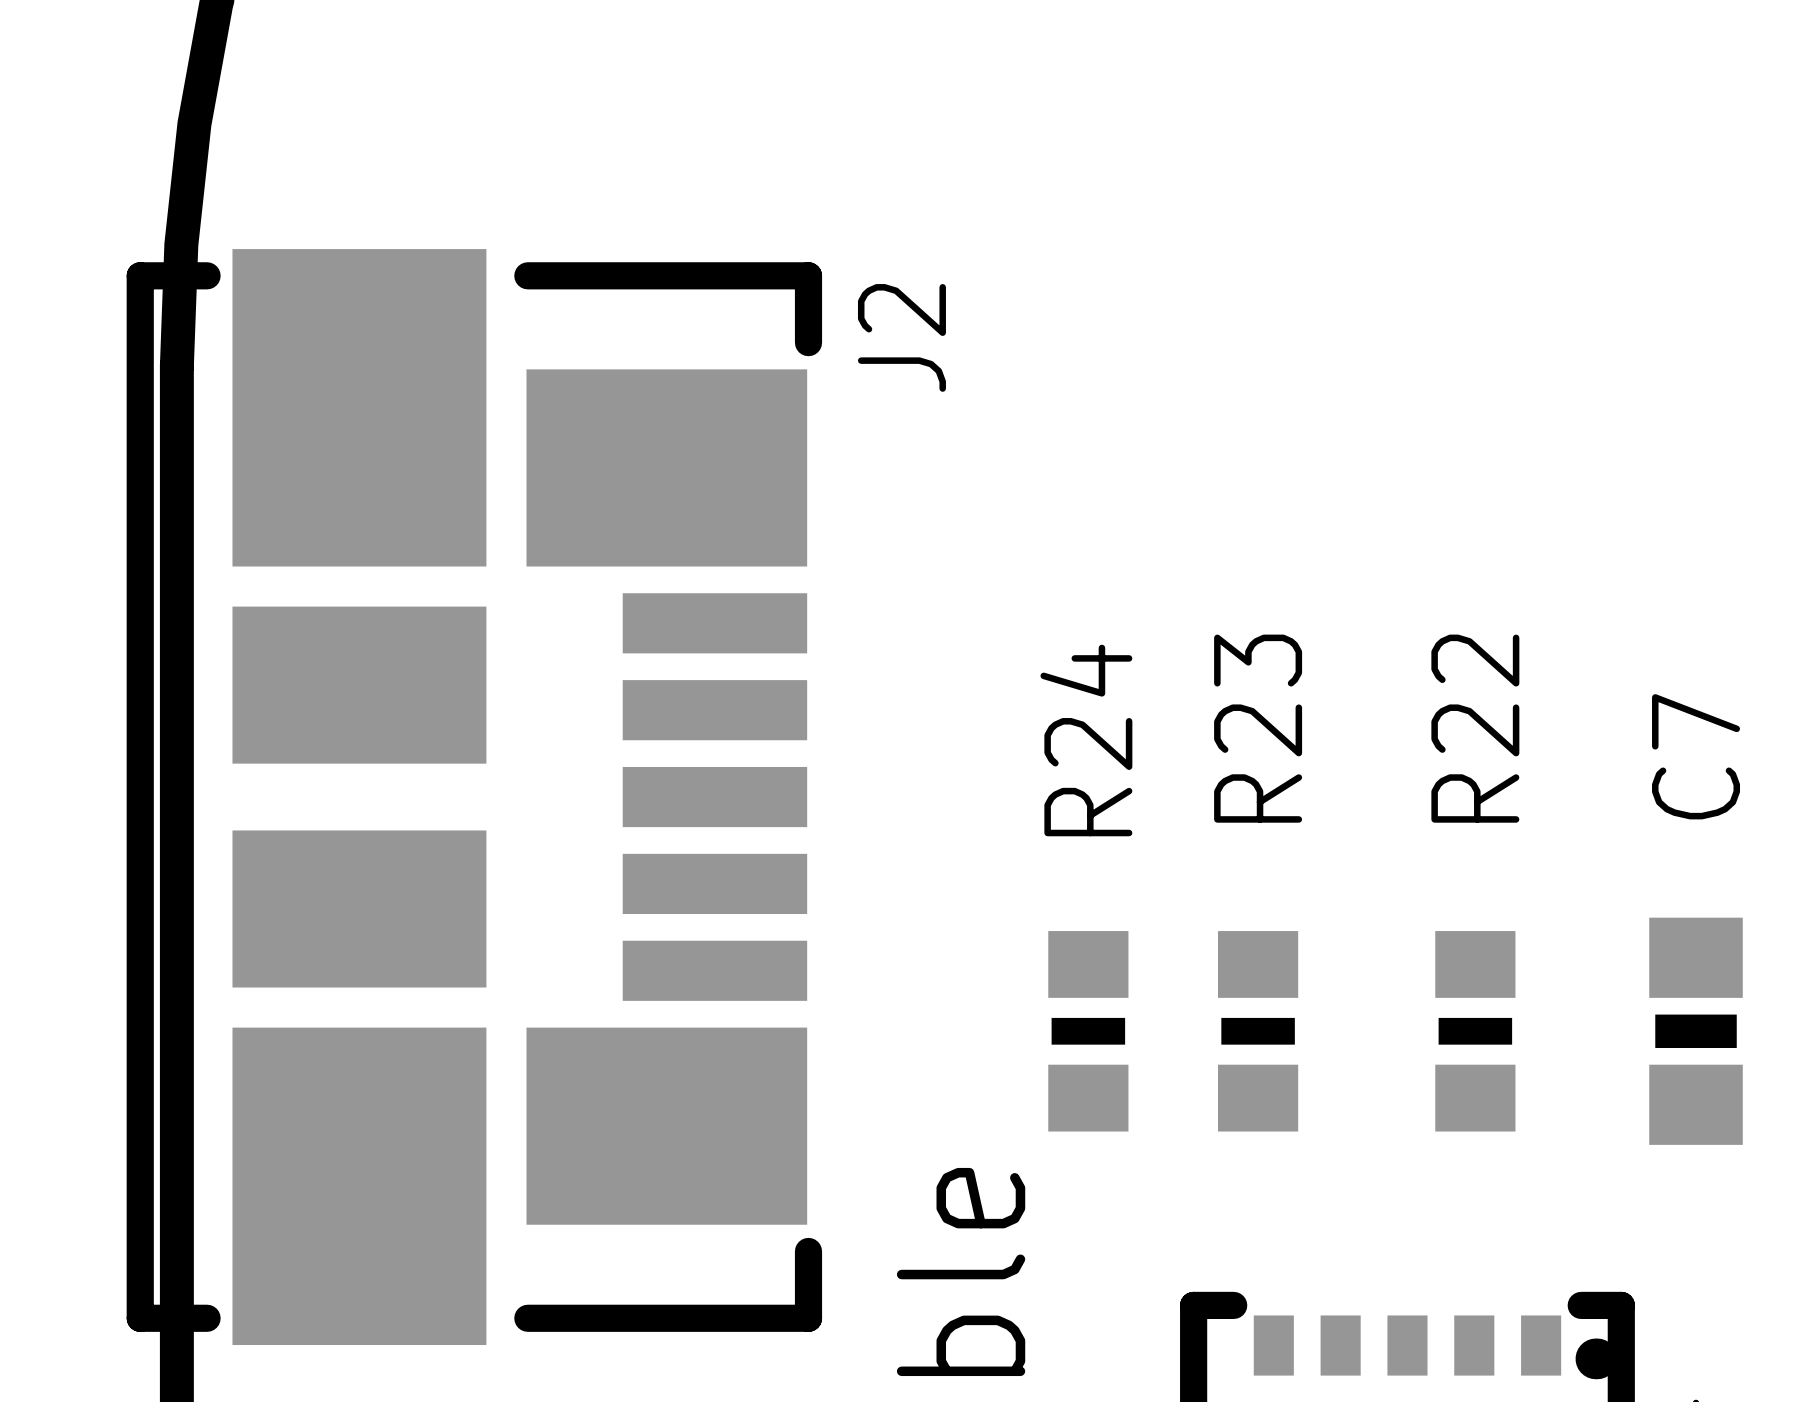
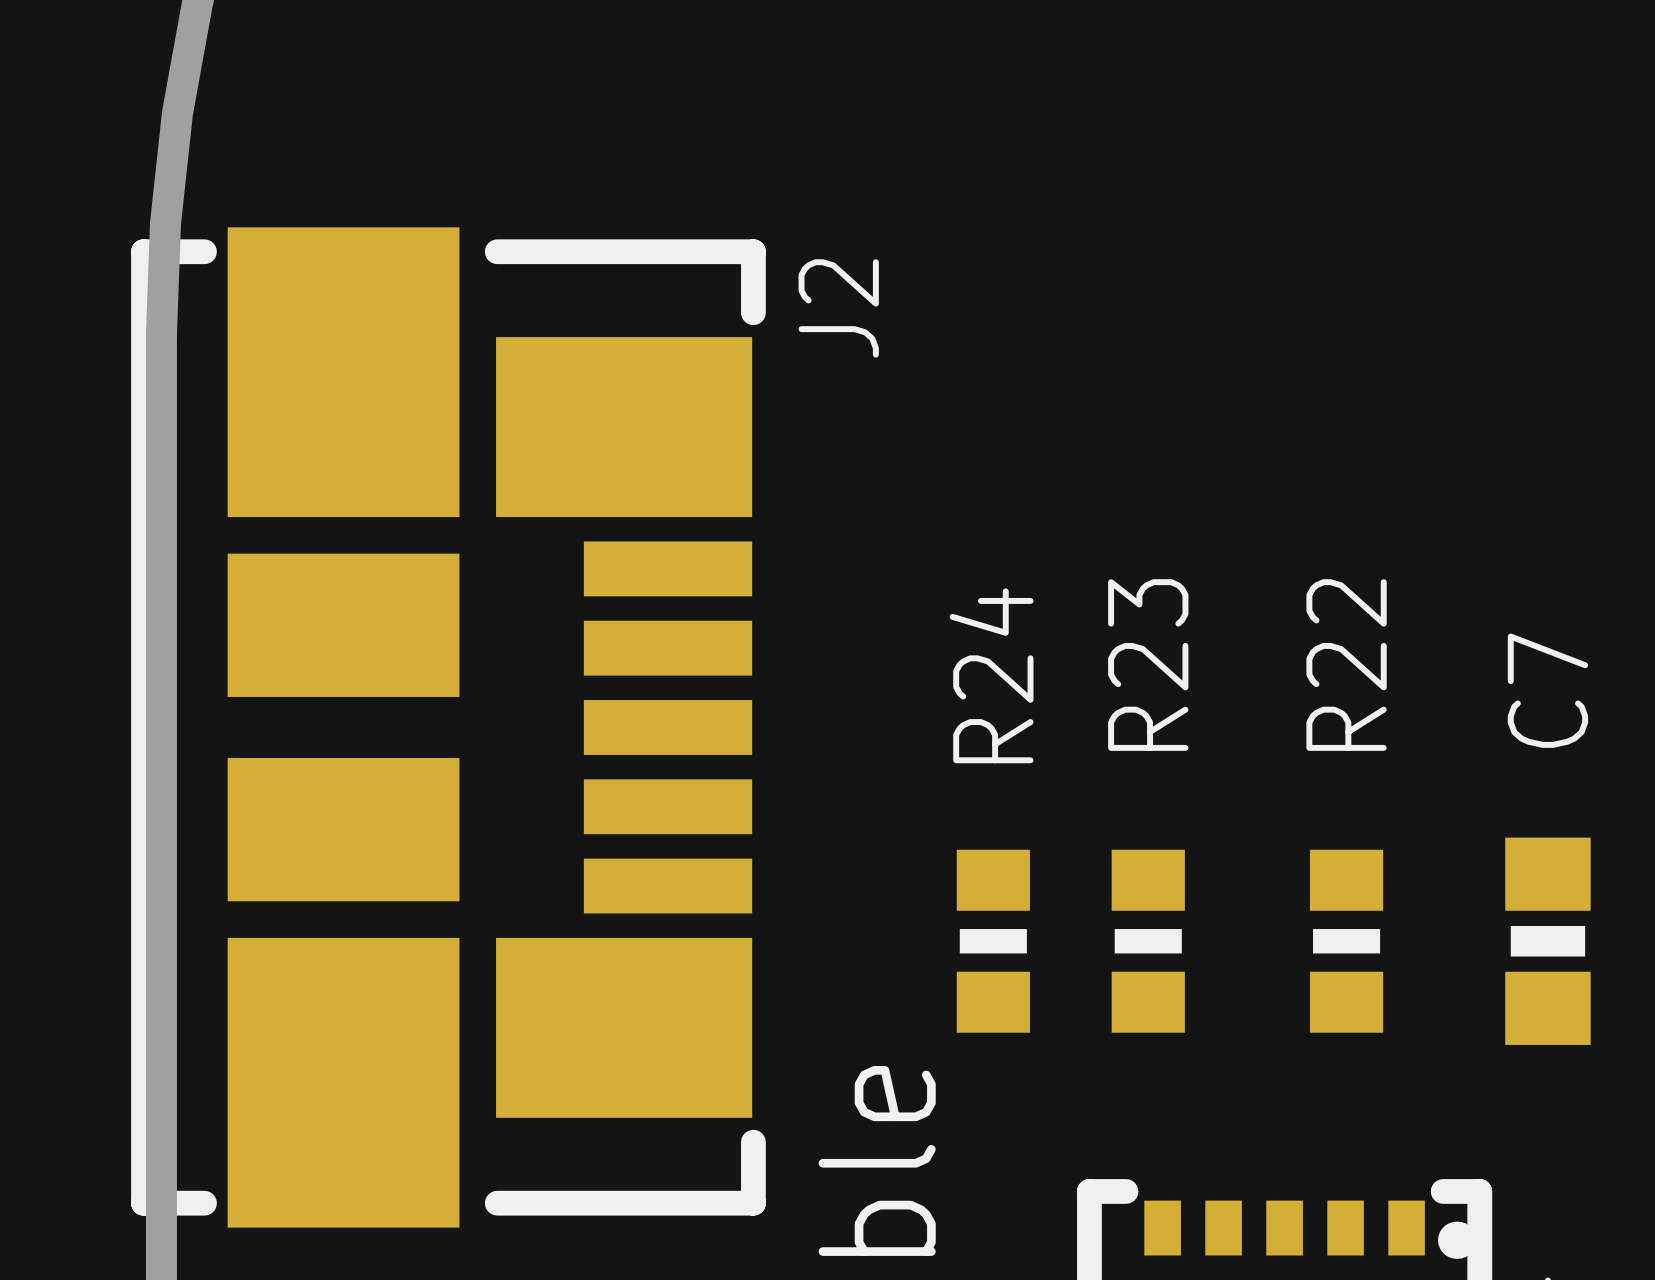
J2 position: (474, 797) -> (448, 727)

